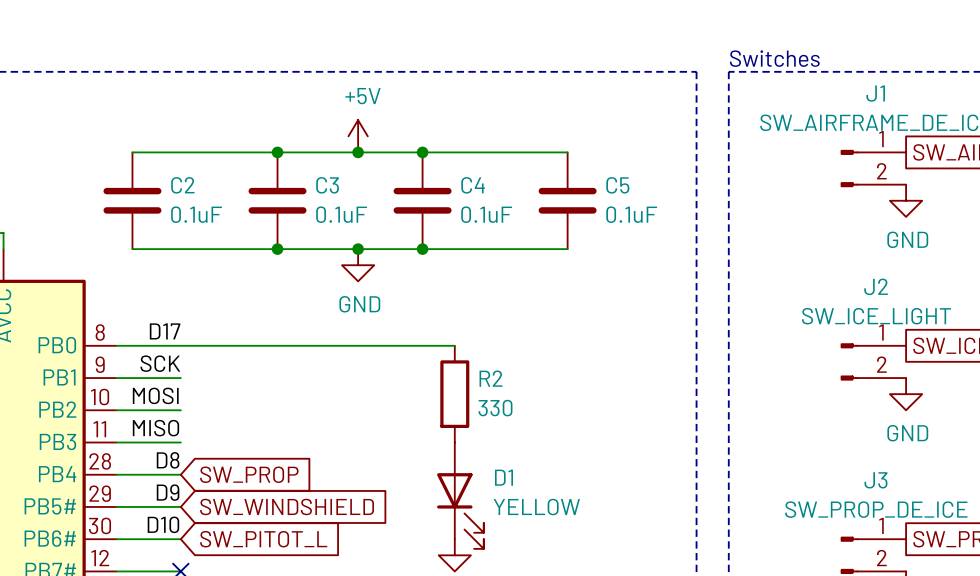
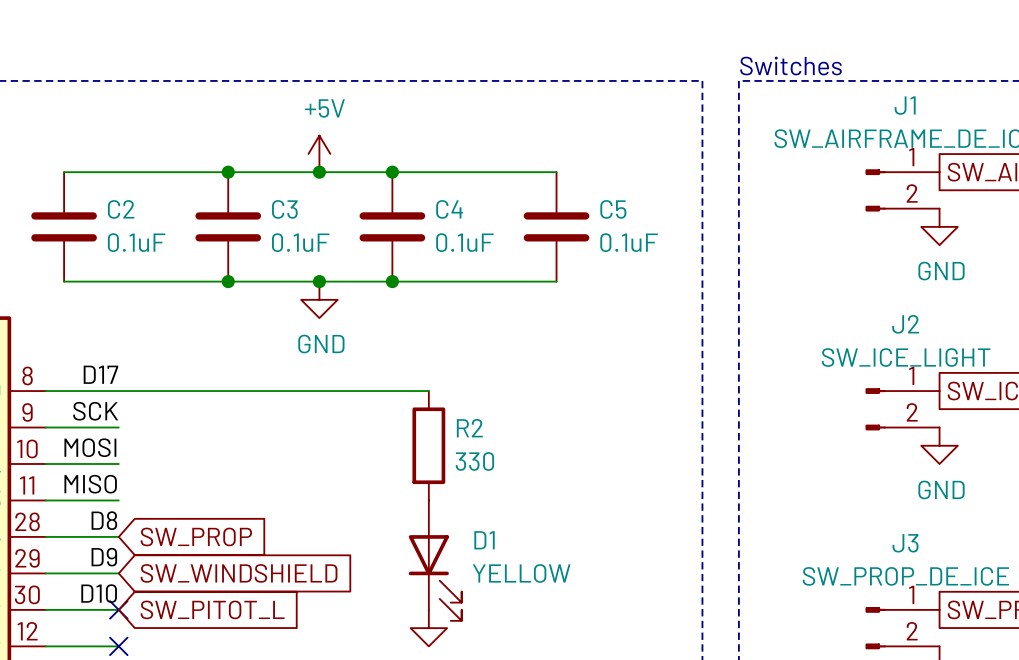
no-connect mark: none -> (118, 609)

